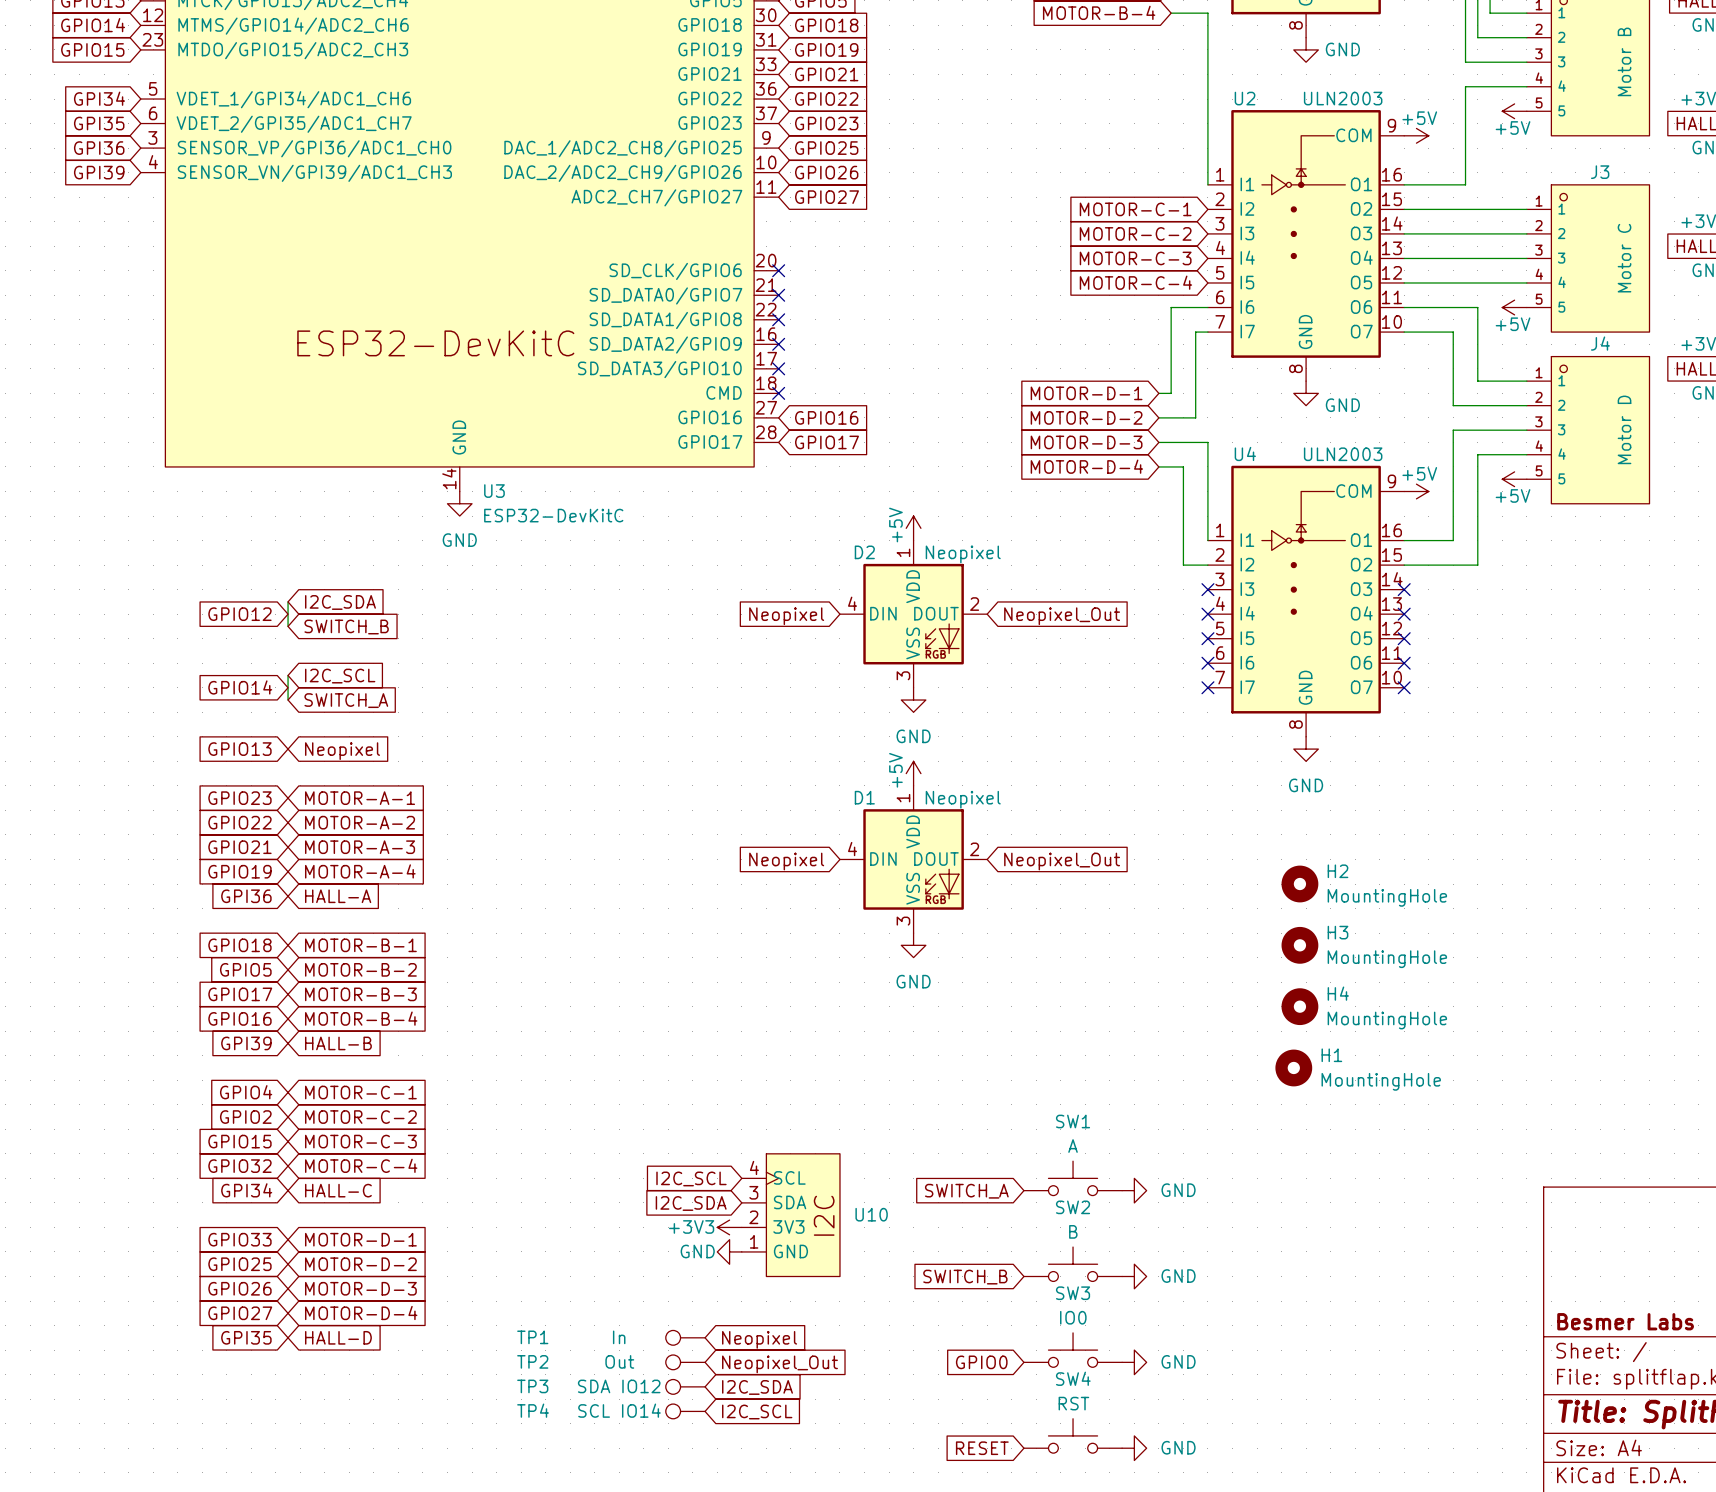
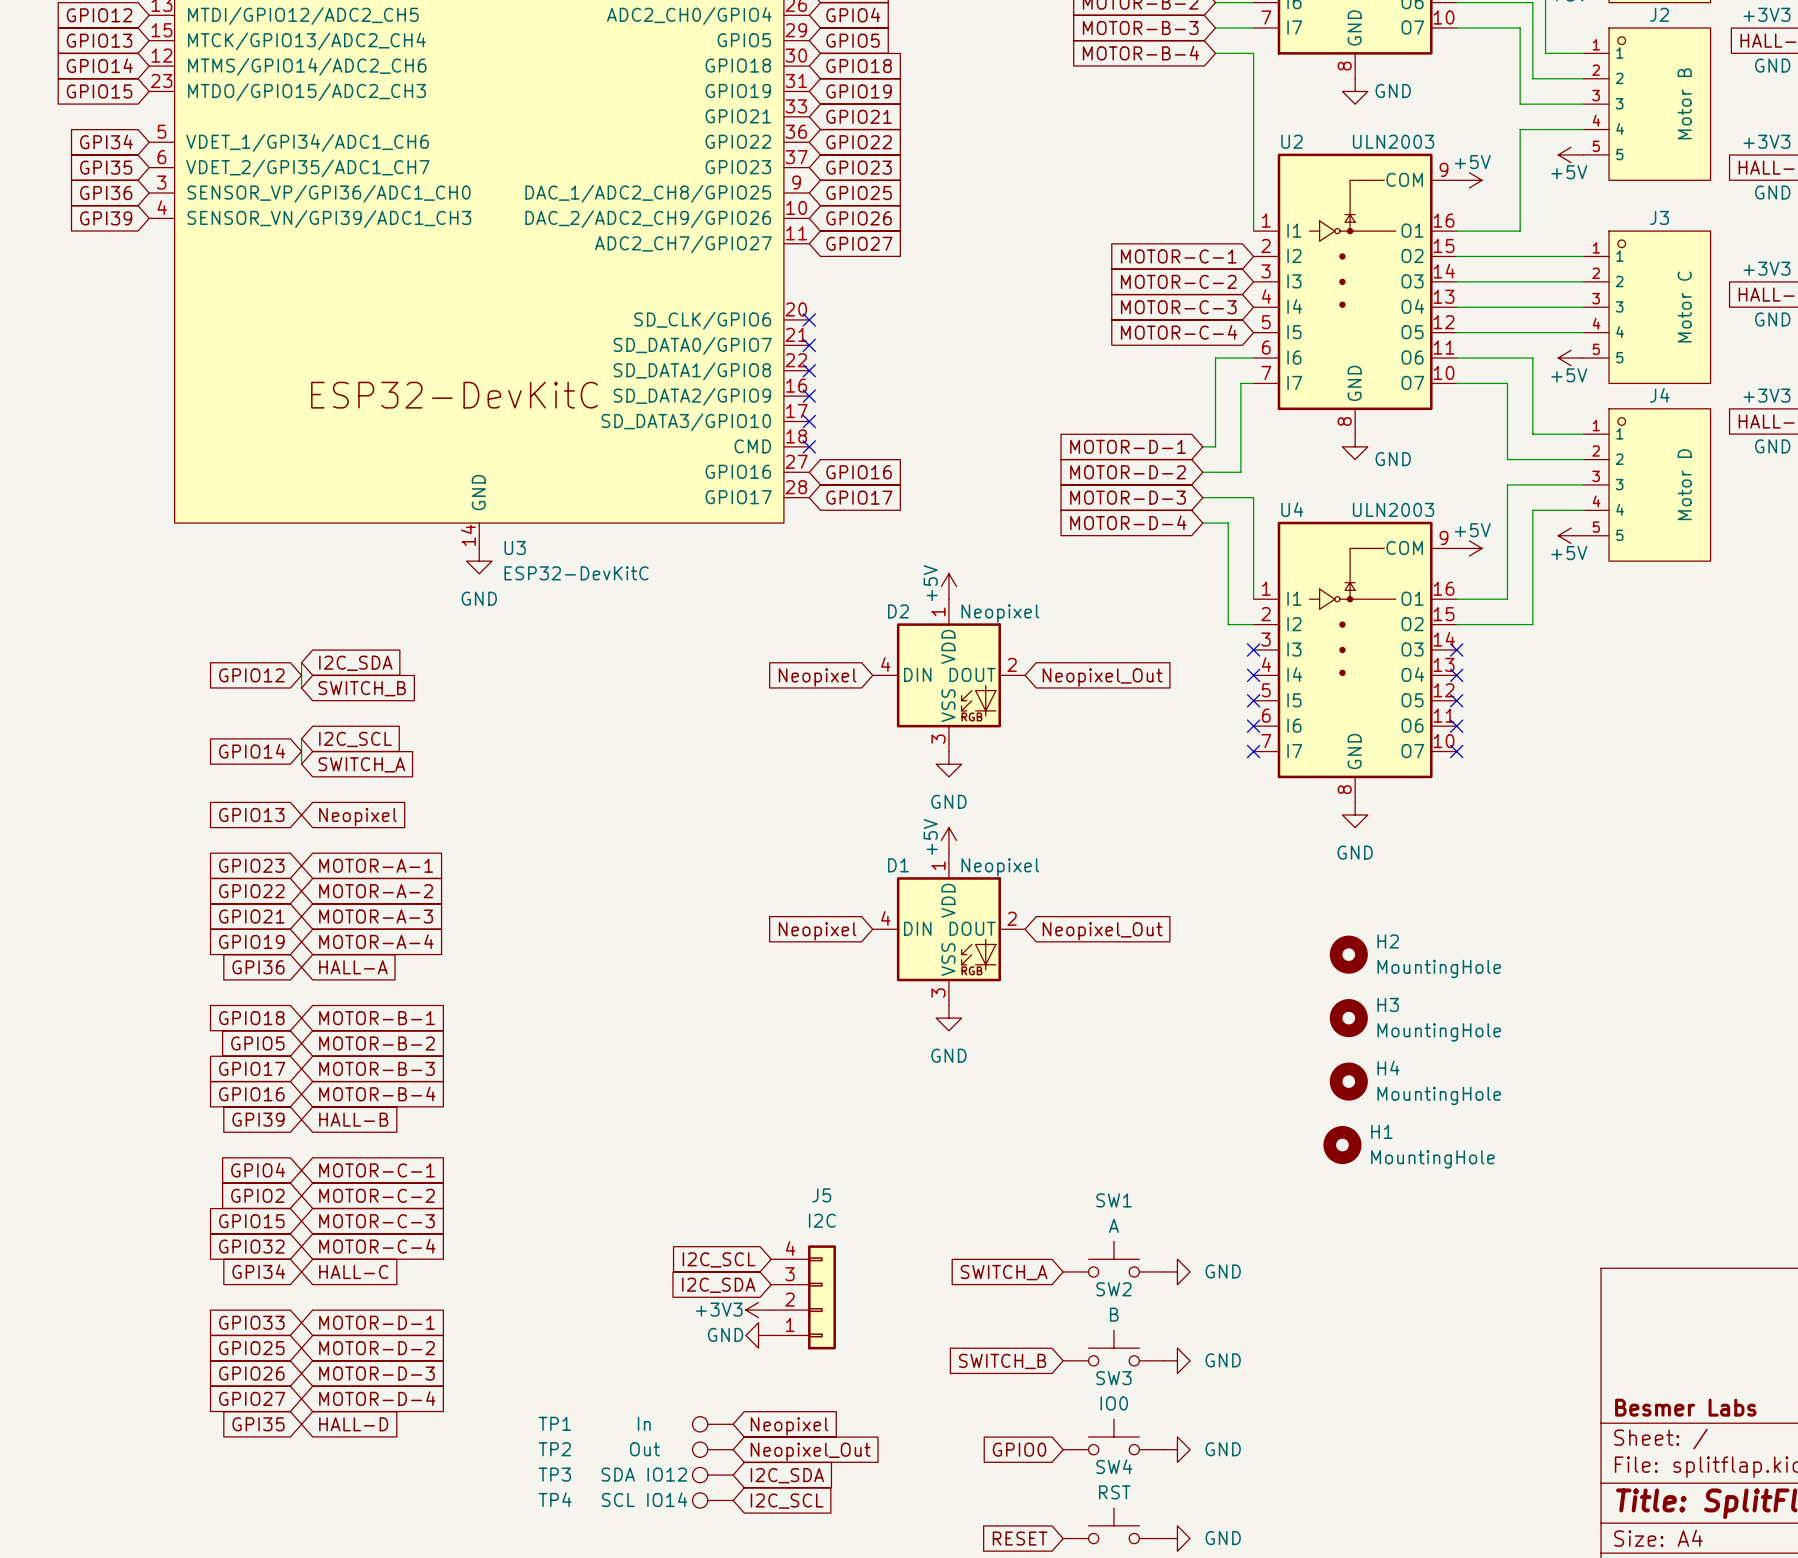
J5: none -> I2C (803, 1297)
U10: (790, 1215) -> none

